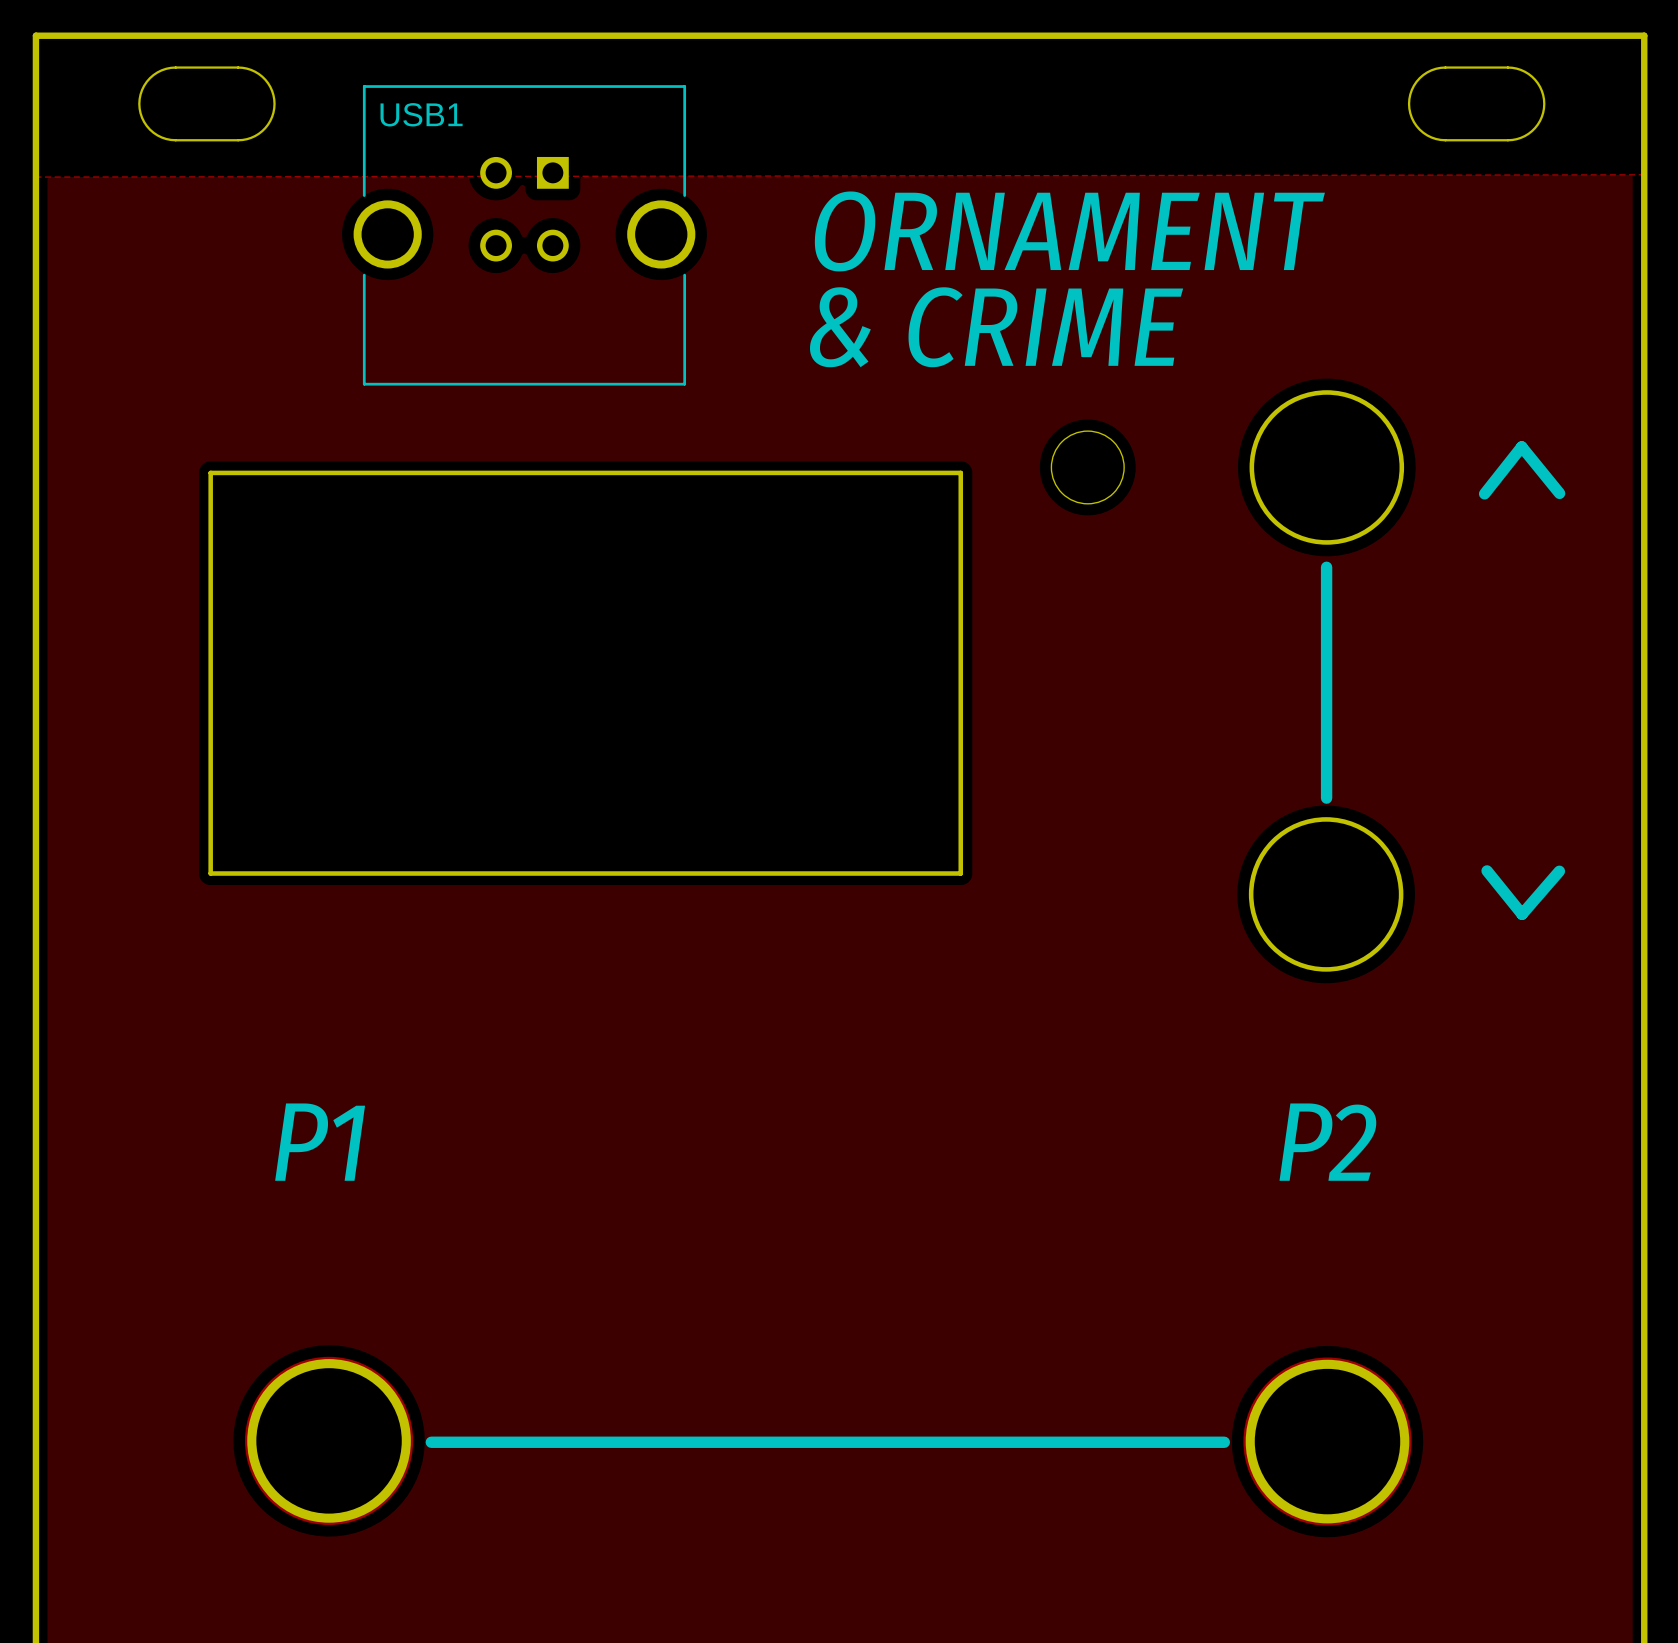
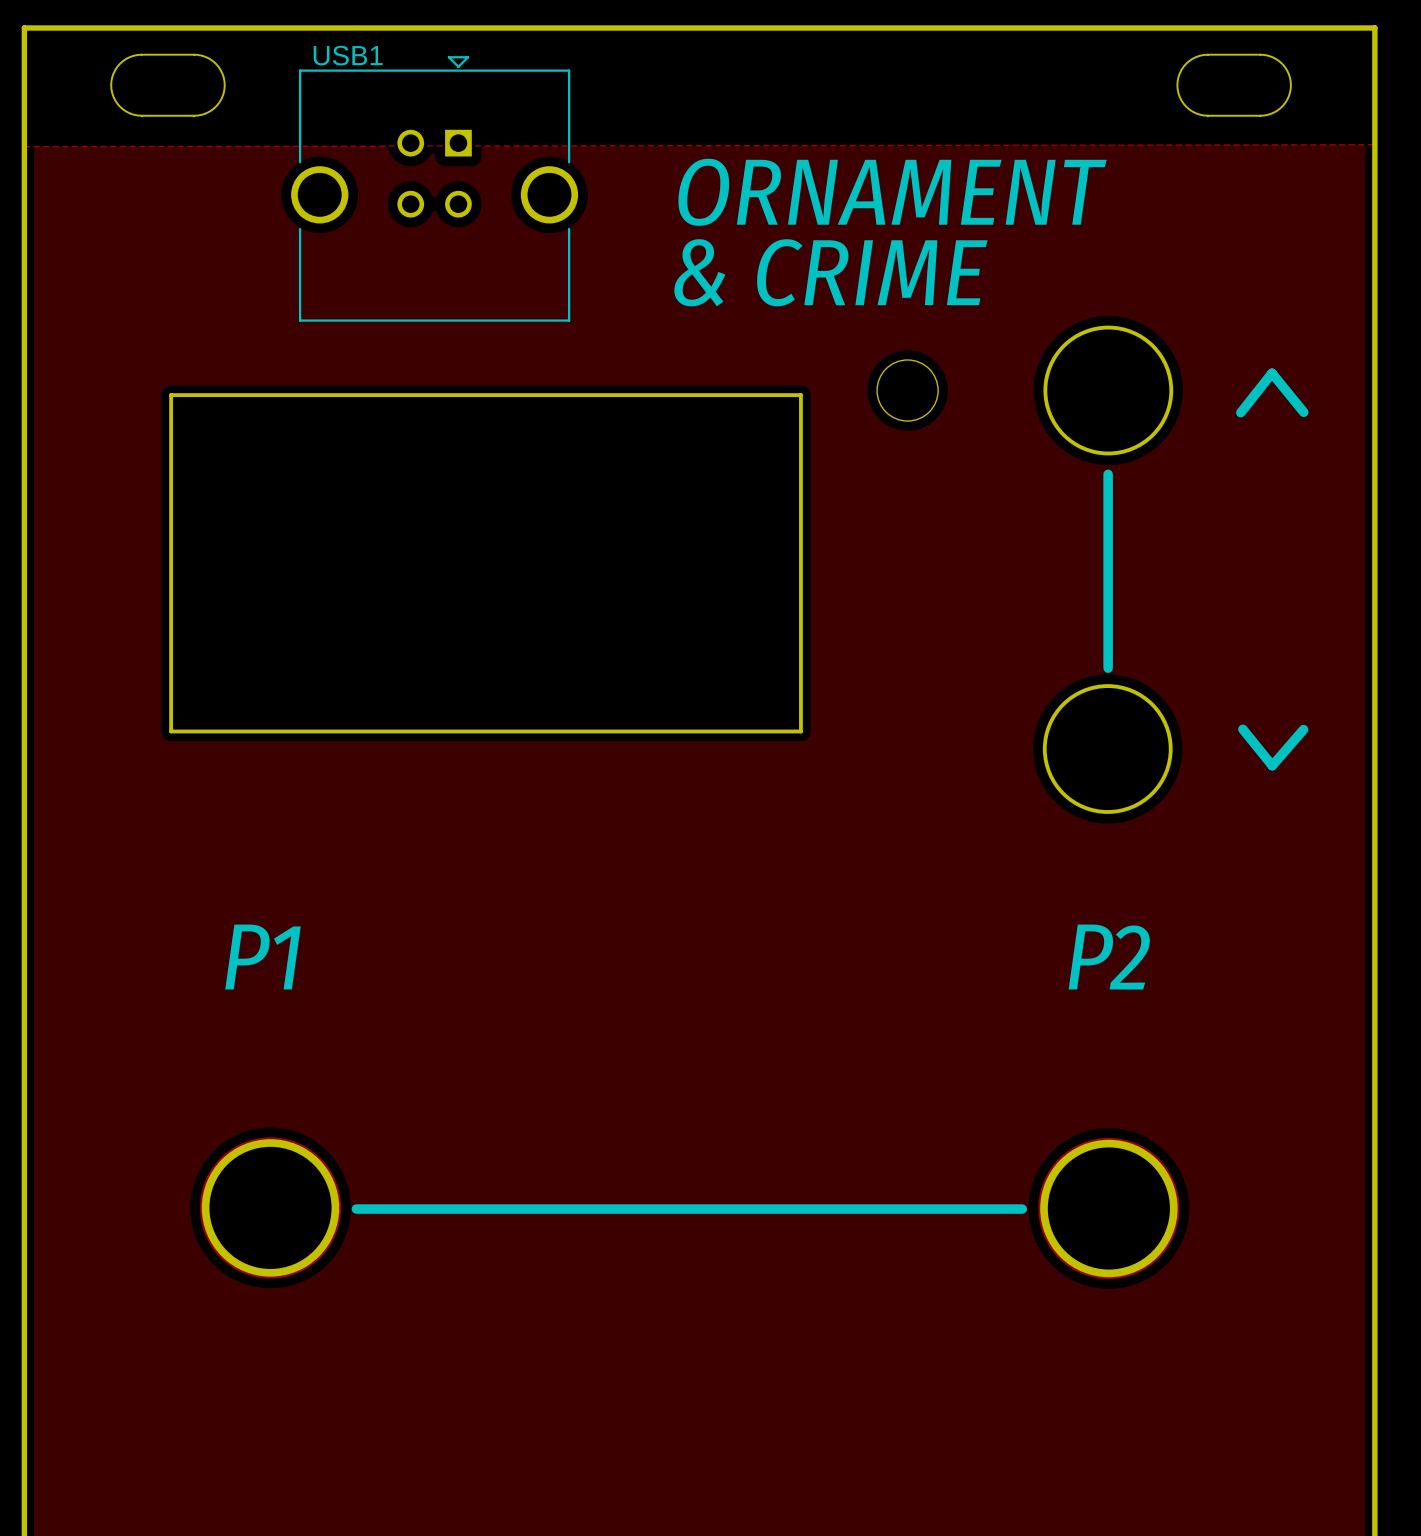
USB1 footprint: [353, 85, 696, 386] -> [291, 56, 579, 322]
USB1 name position: USB1 (421, 114) -> USB1 (348, 55)

